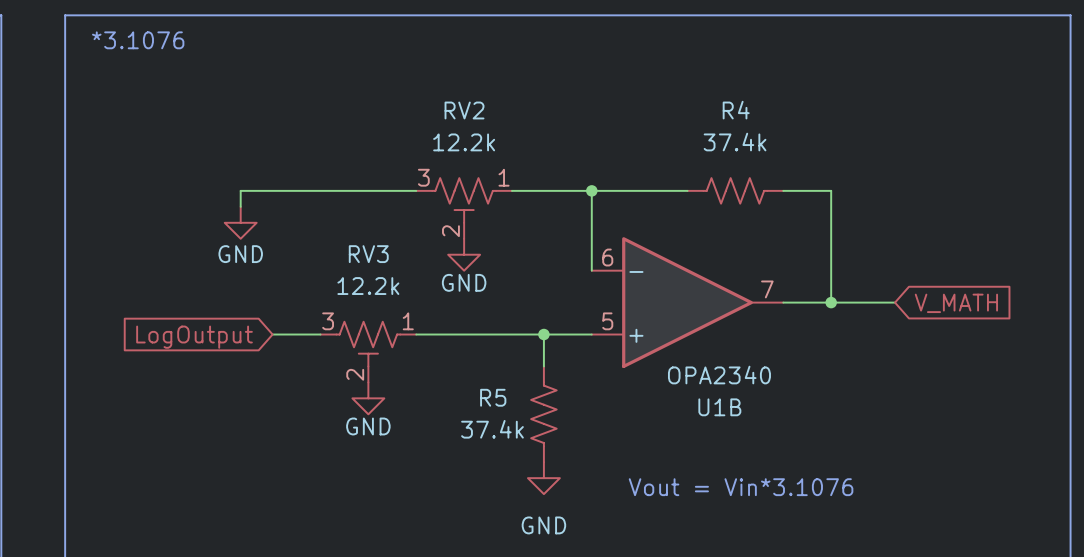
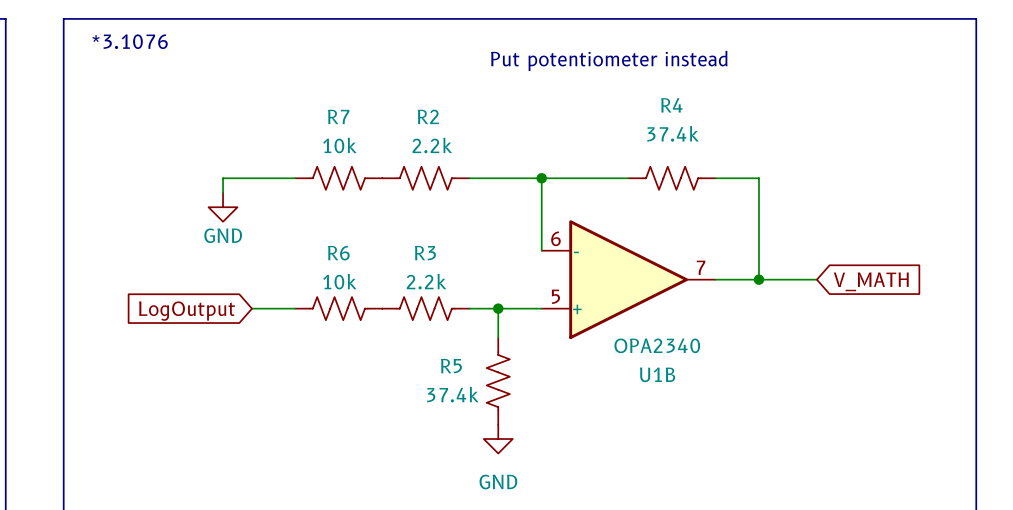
text: none -> Put potentiometer instead (609, 60)
R7: none -> 10k (338, 178)
R2: none -> 2.2k (425, 178)
RV2: 12.2k (464, 208) -> none
power symbol: GND (464, 254) -> none
R6: none -> 10k (338, 308)
R3: none -> 2.2k (425, 308)
RV3: 12.2k (368, 352) -> none
power symbol: GND (368, 398) -> none
text: Vout = Vin*3.1076 (741, 487) -> none

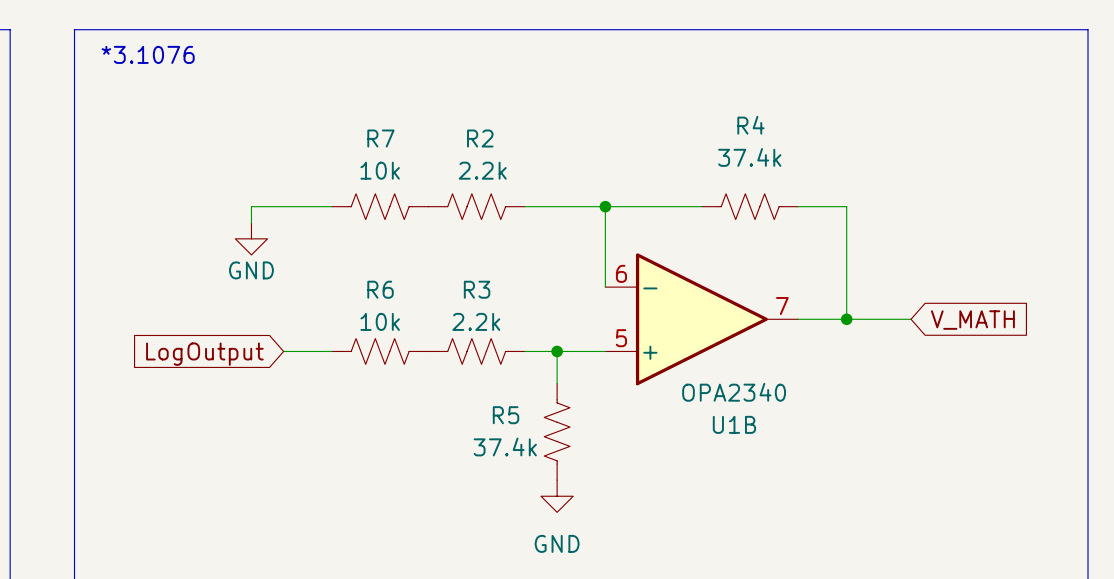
text: Put potentiometer instead (609, 60) -> none

